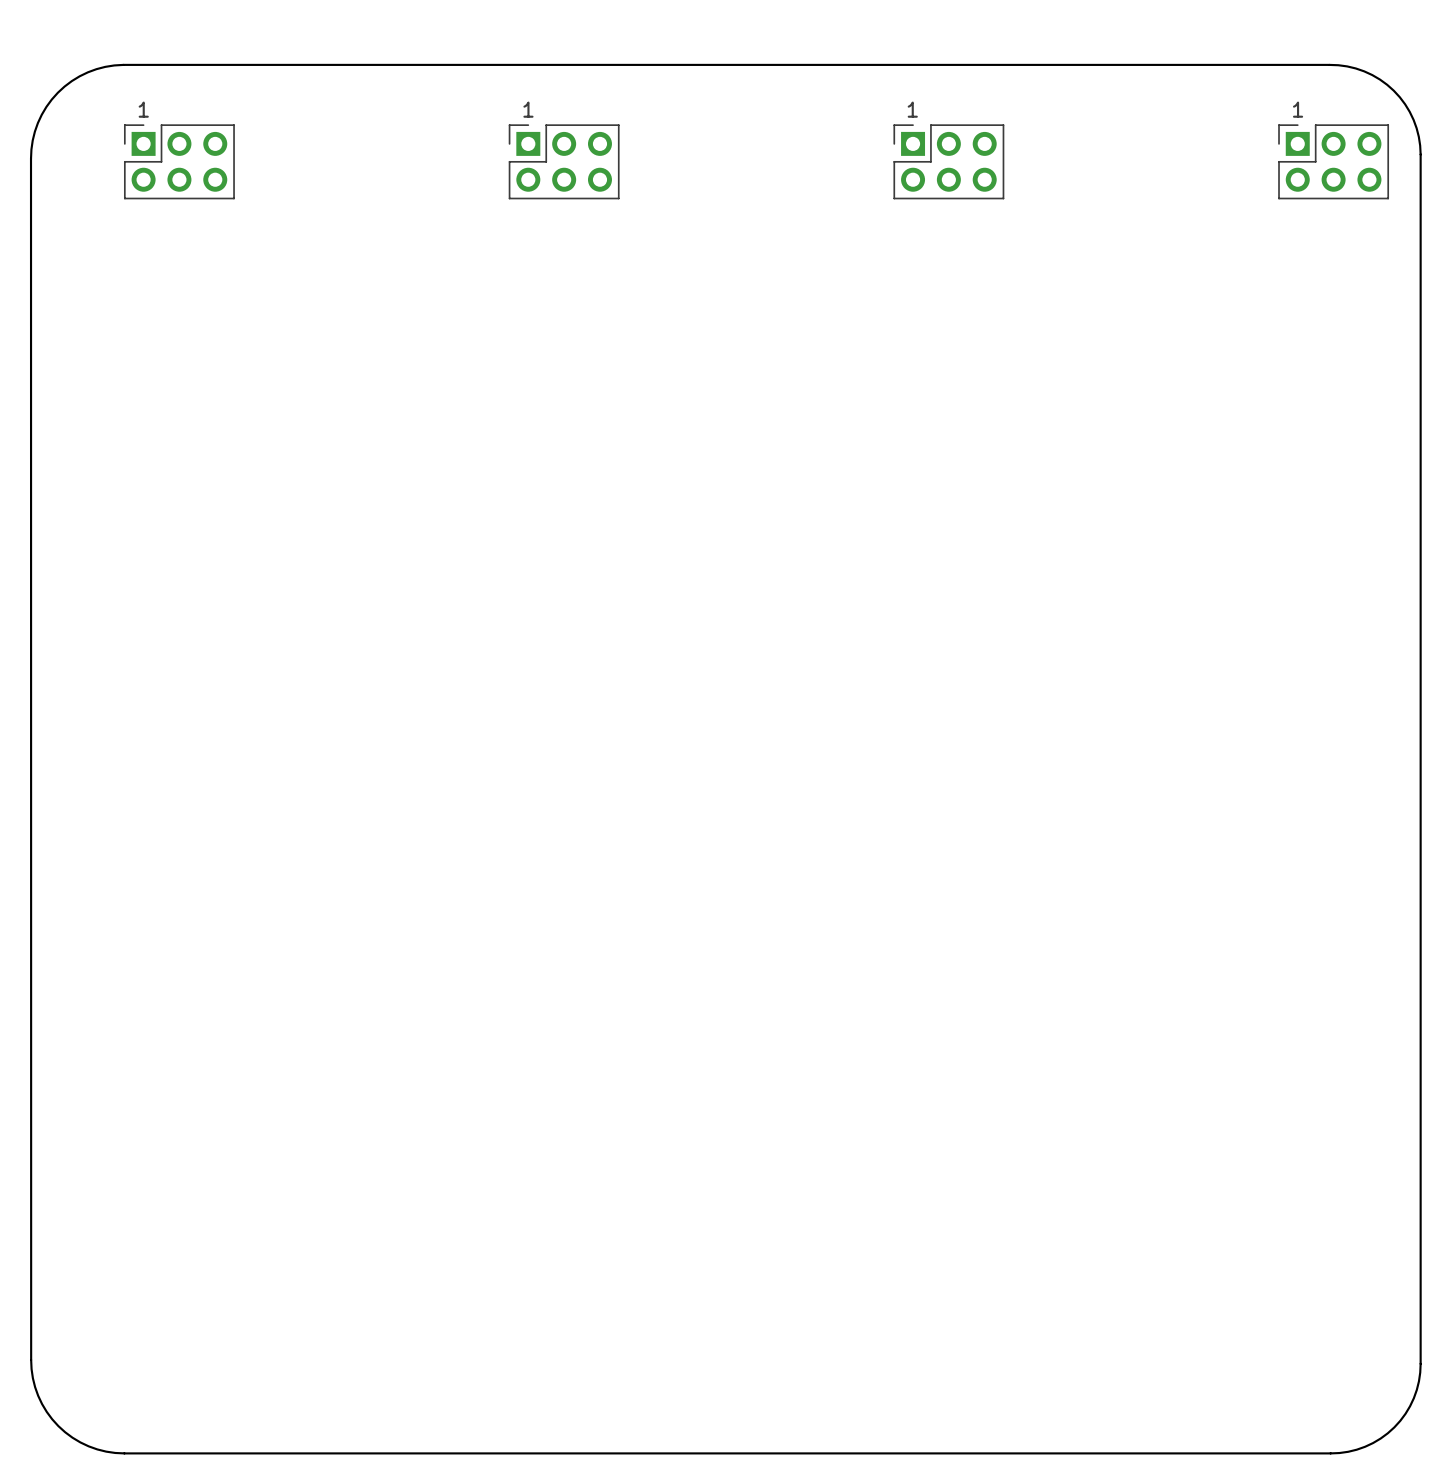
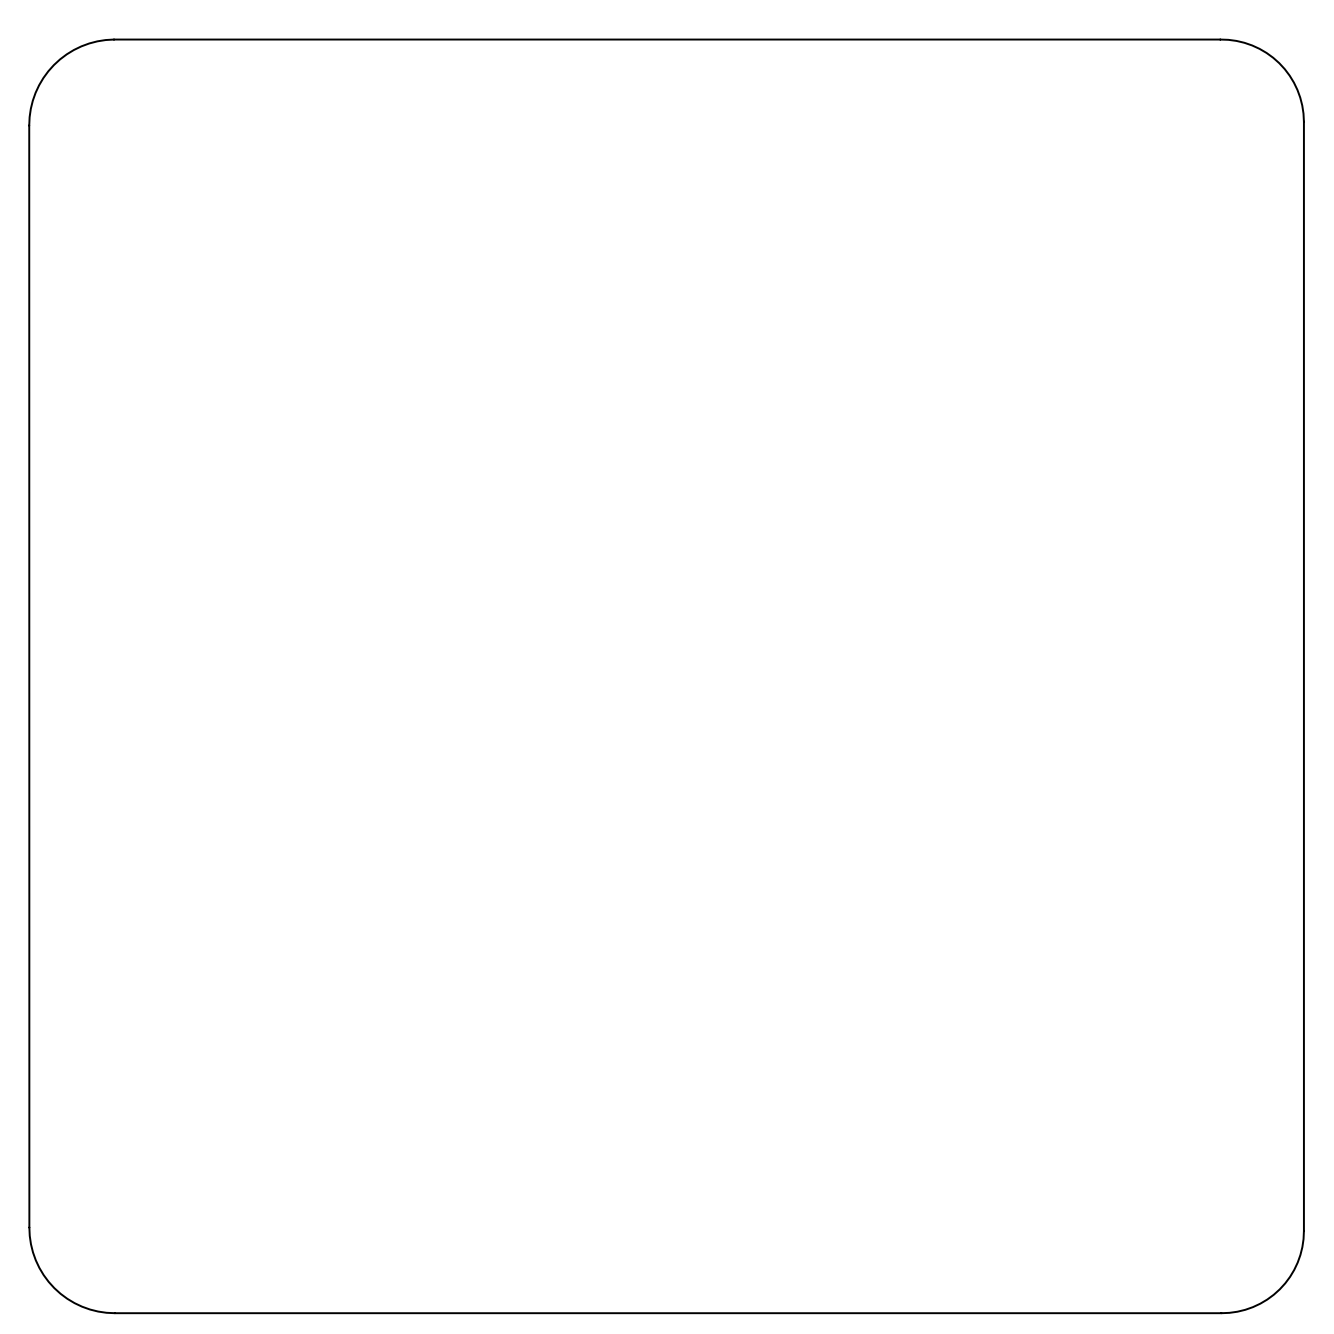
text: 1 (143, 109) -> none
text: 1 (528, 109) -> none
text: 1 (912, 109) -> none
text: 1 (1298, 109) -> none
part: (179, 161) -> none
part: (564, 161) -> none
part: (948, 161) -> none
part: (1333, 161) -> none

